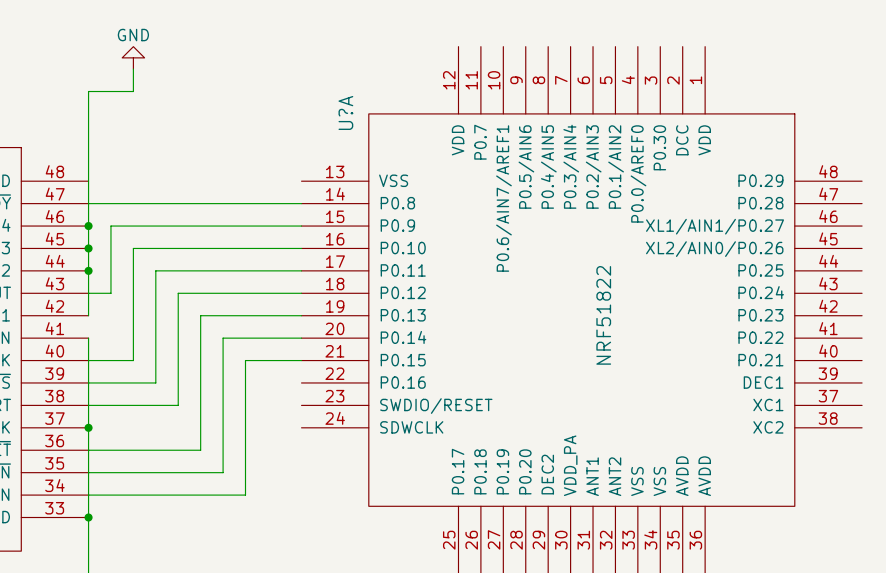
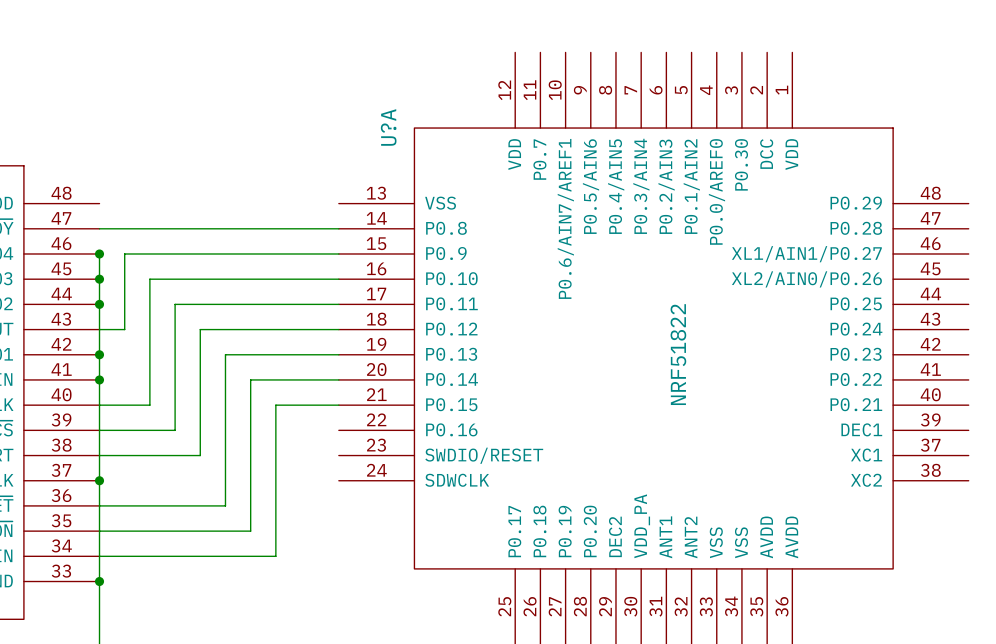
power symbol: GND (133, 57) -> none
wire: (133, 69) (133, 91) (88, 91) (88, 226) -> none
wire: none -> (99, 354) (99, 379)
junction: none -> (99, 354)
junction: none -> (99, 379)

